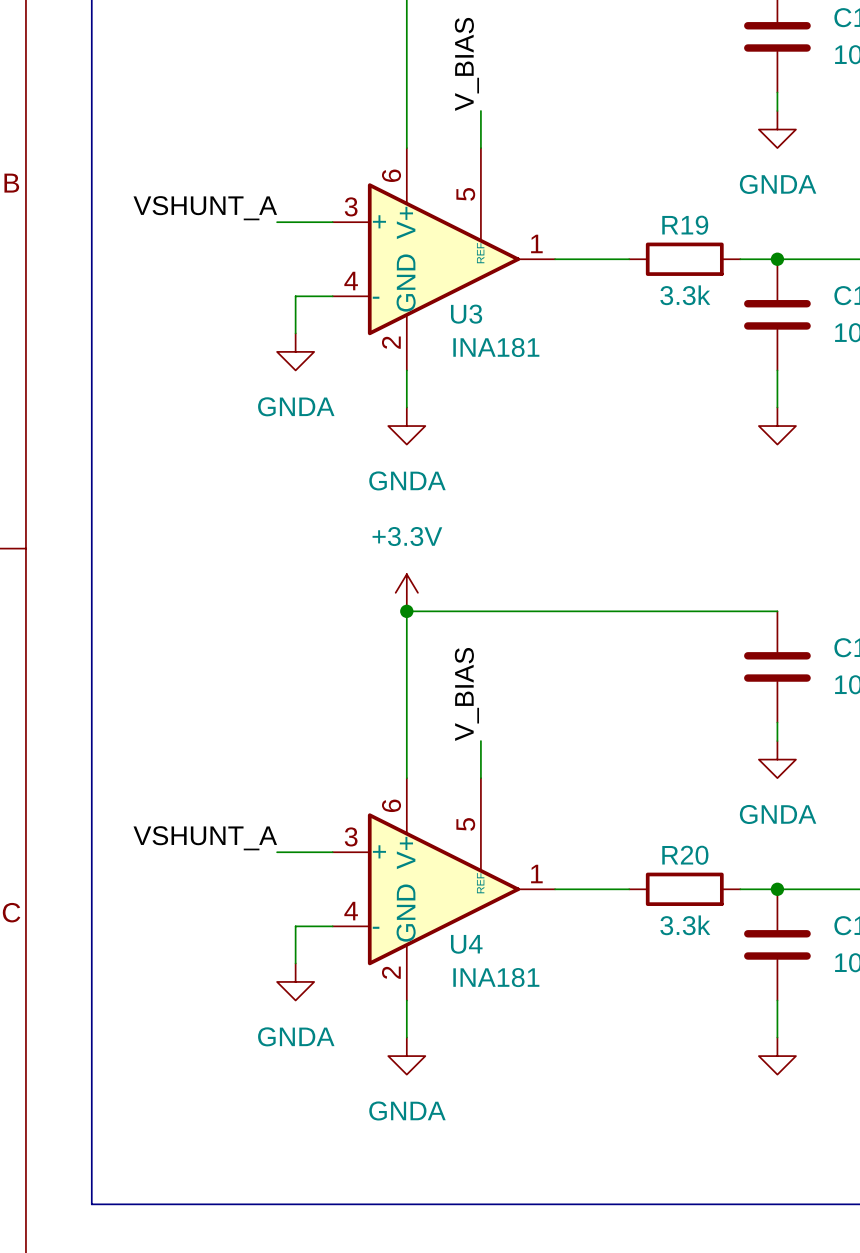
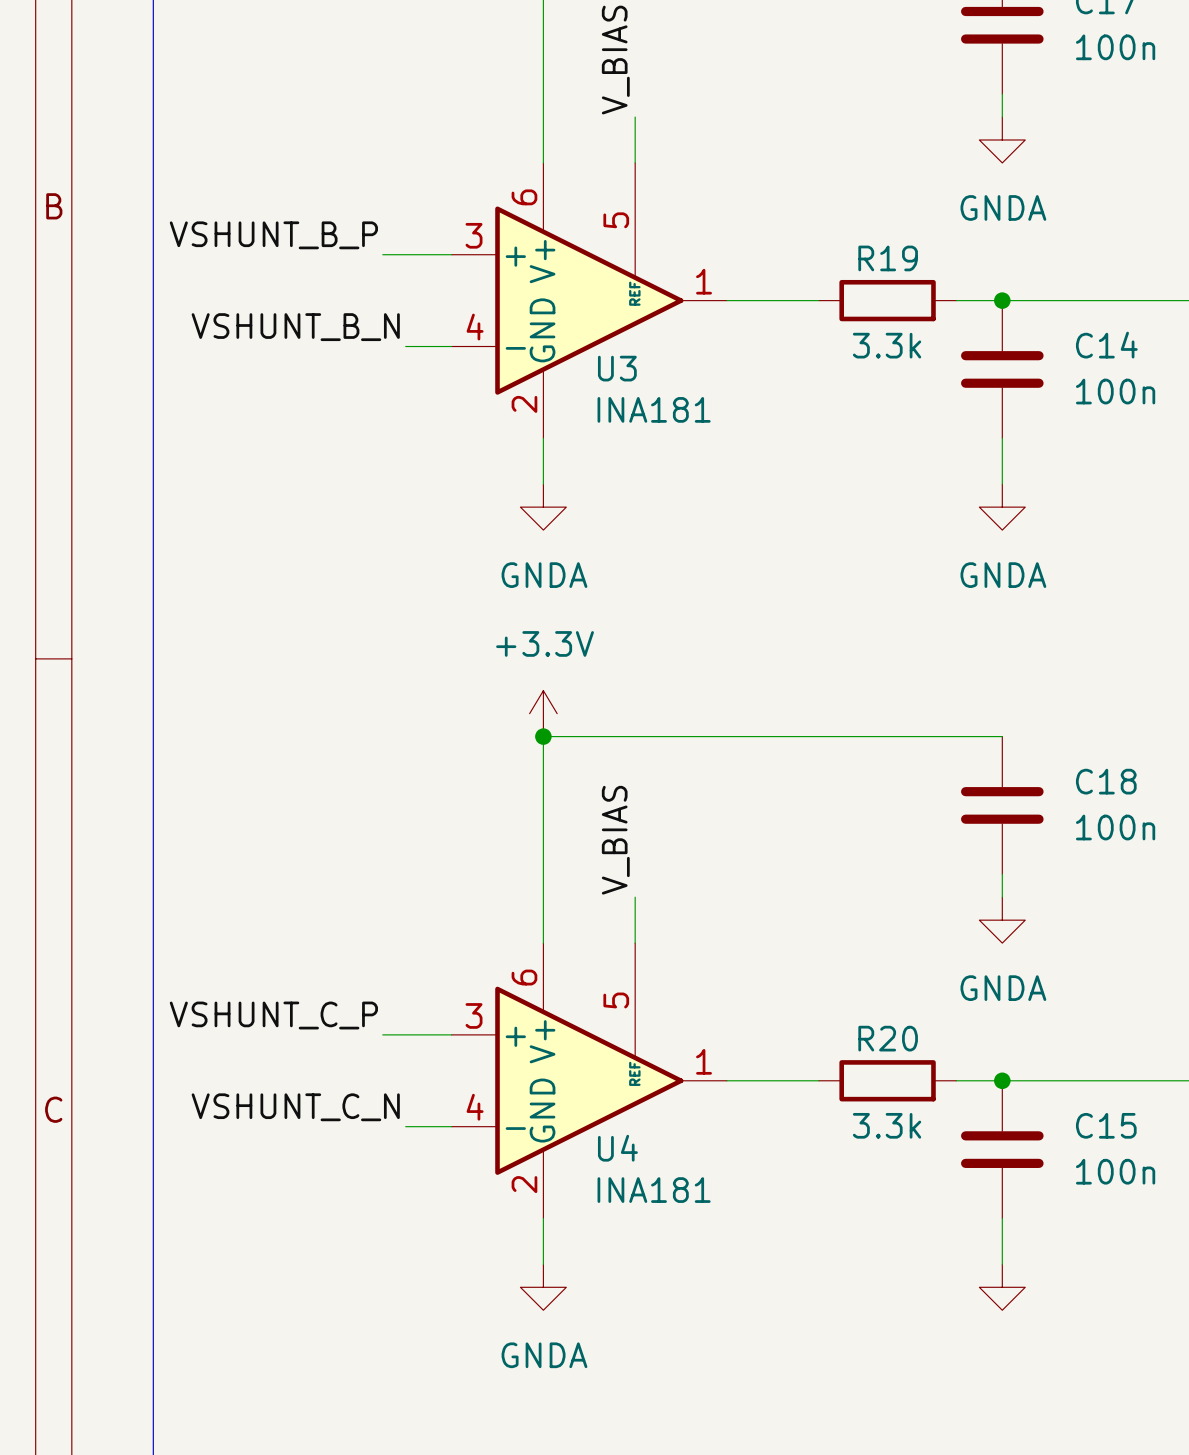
label: VSHUNT_A (205, 208) -> VSHUNT_B_P (273, 235)
label: none -> VSHUNT_B_N (295, 327)
wire: (295, 296) (295, 333) -> none
power symbol: GNDA (295, 351) -> none
power symbol text: none -> GNDA (1003, 575)
label: VSHUNT_A (205, 838) -> VSHUNT_C_P (273, 1015)
label: none -> VSHUNT_C_N (295, 1107)
wire: (295, 926) (295, 963) -> none
power symbol: GNDA (295, 981) -> none

